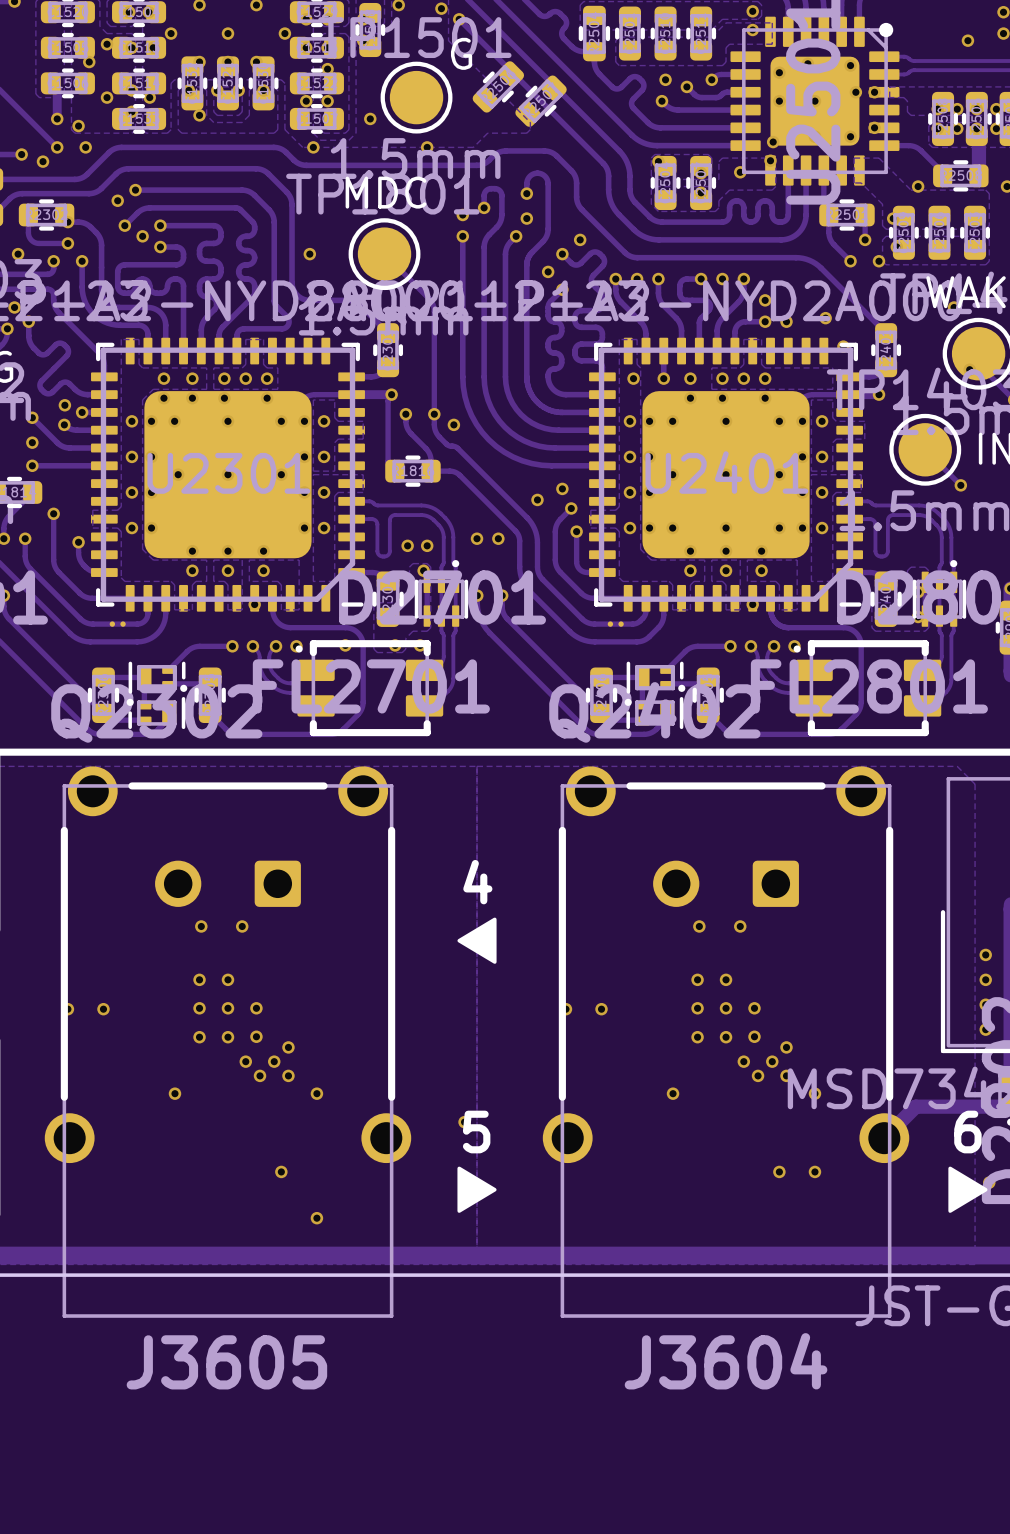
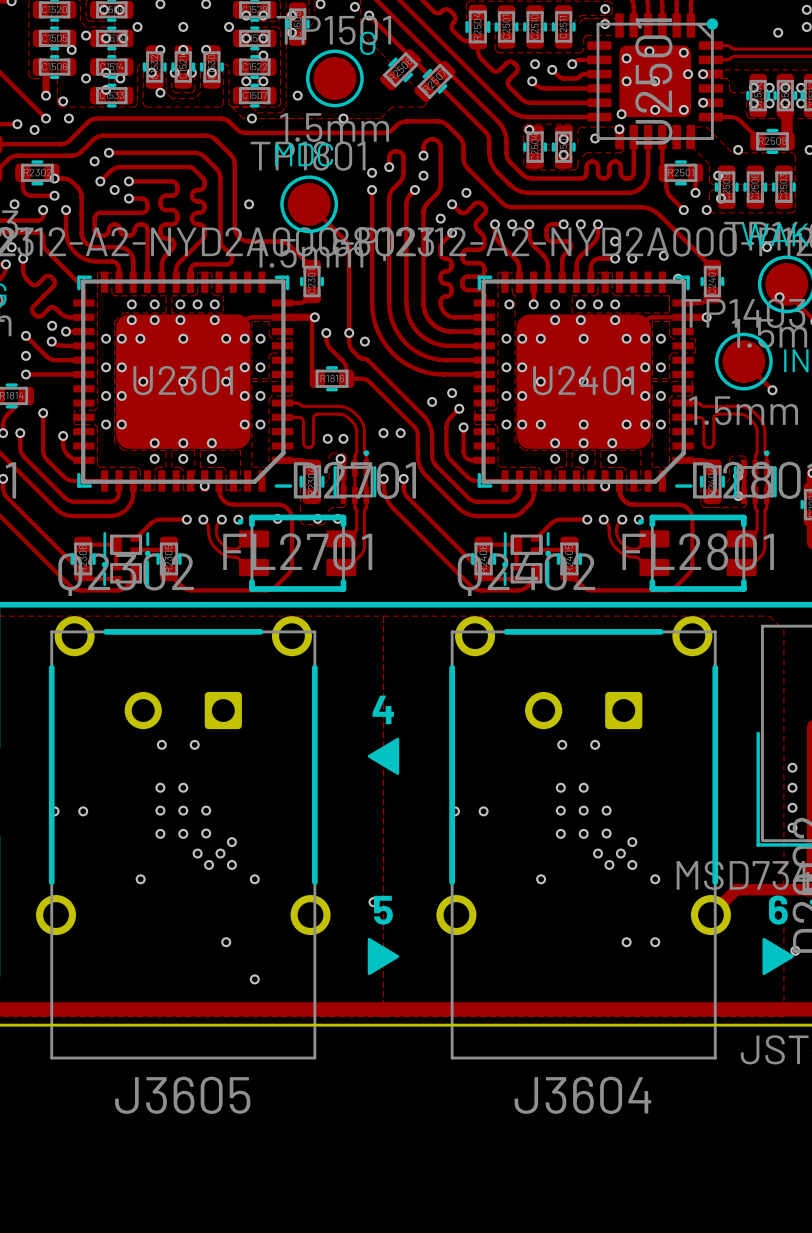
zone outline: none -> (251, 104) (249, 107) (231, 107)

